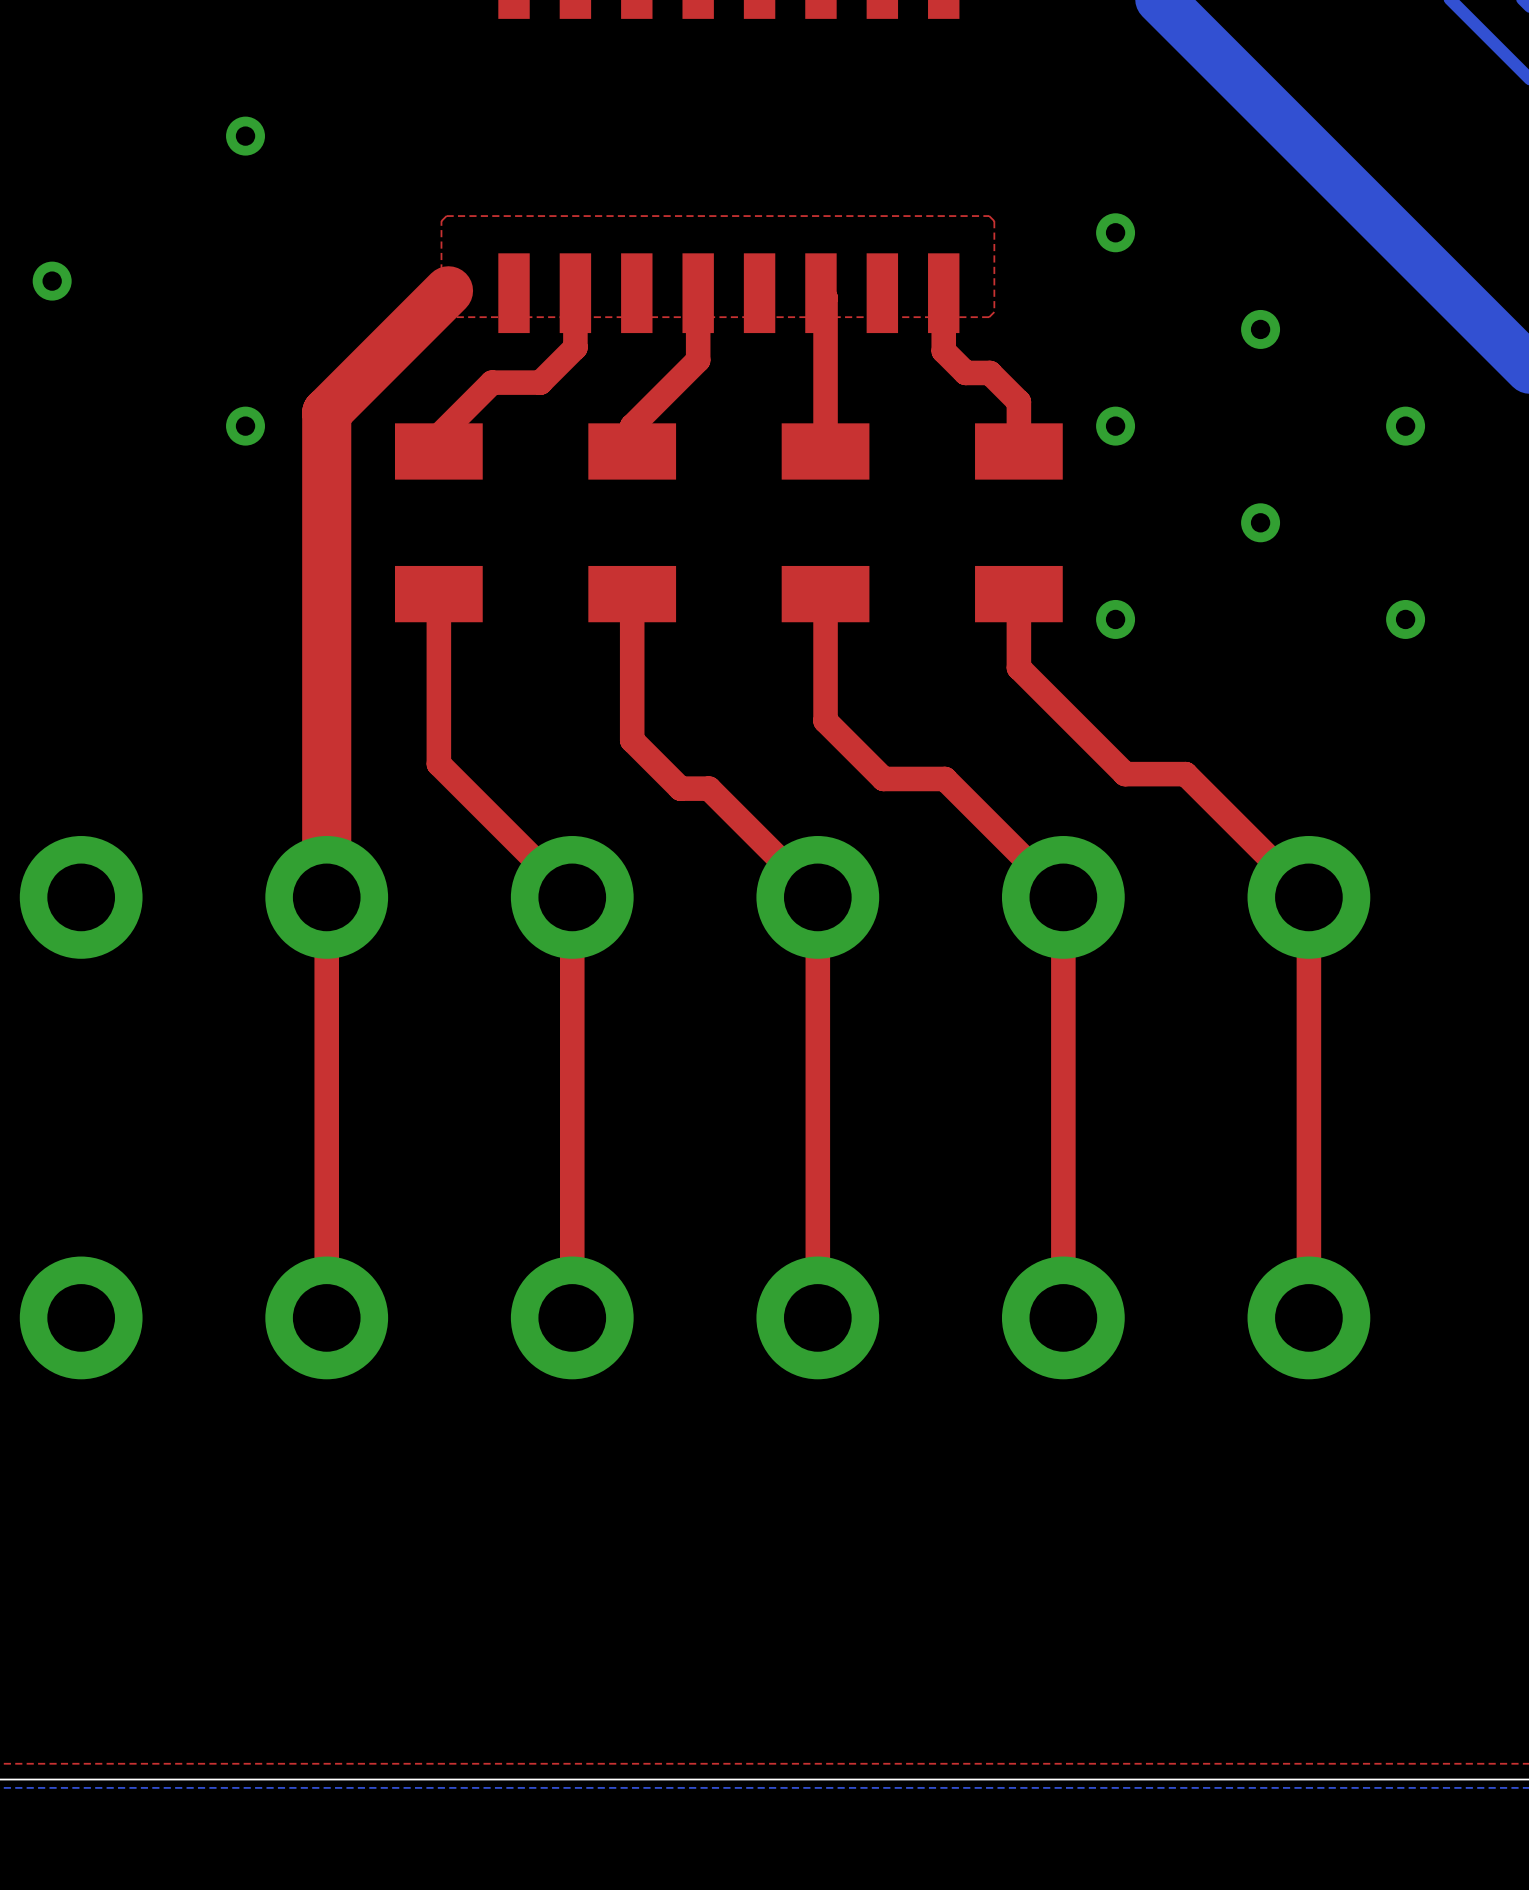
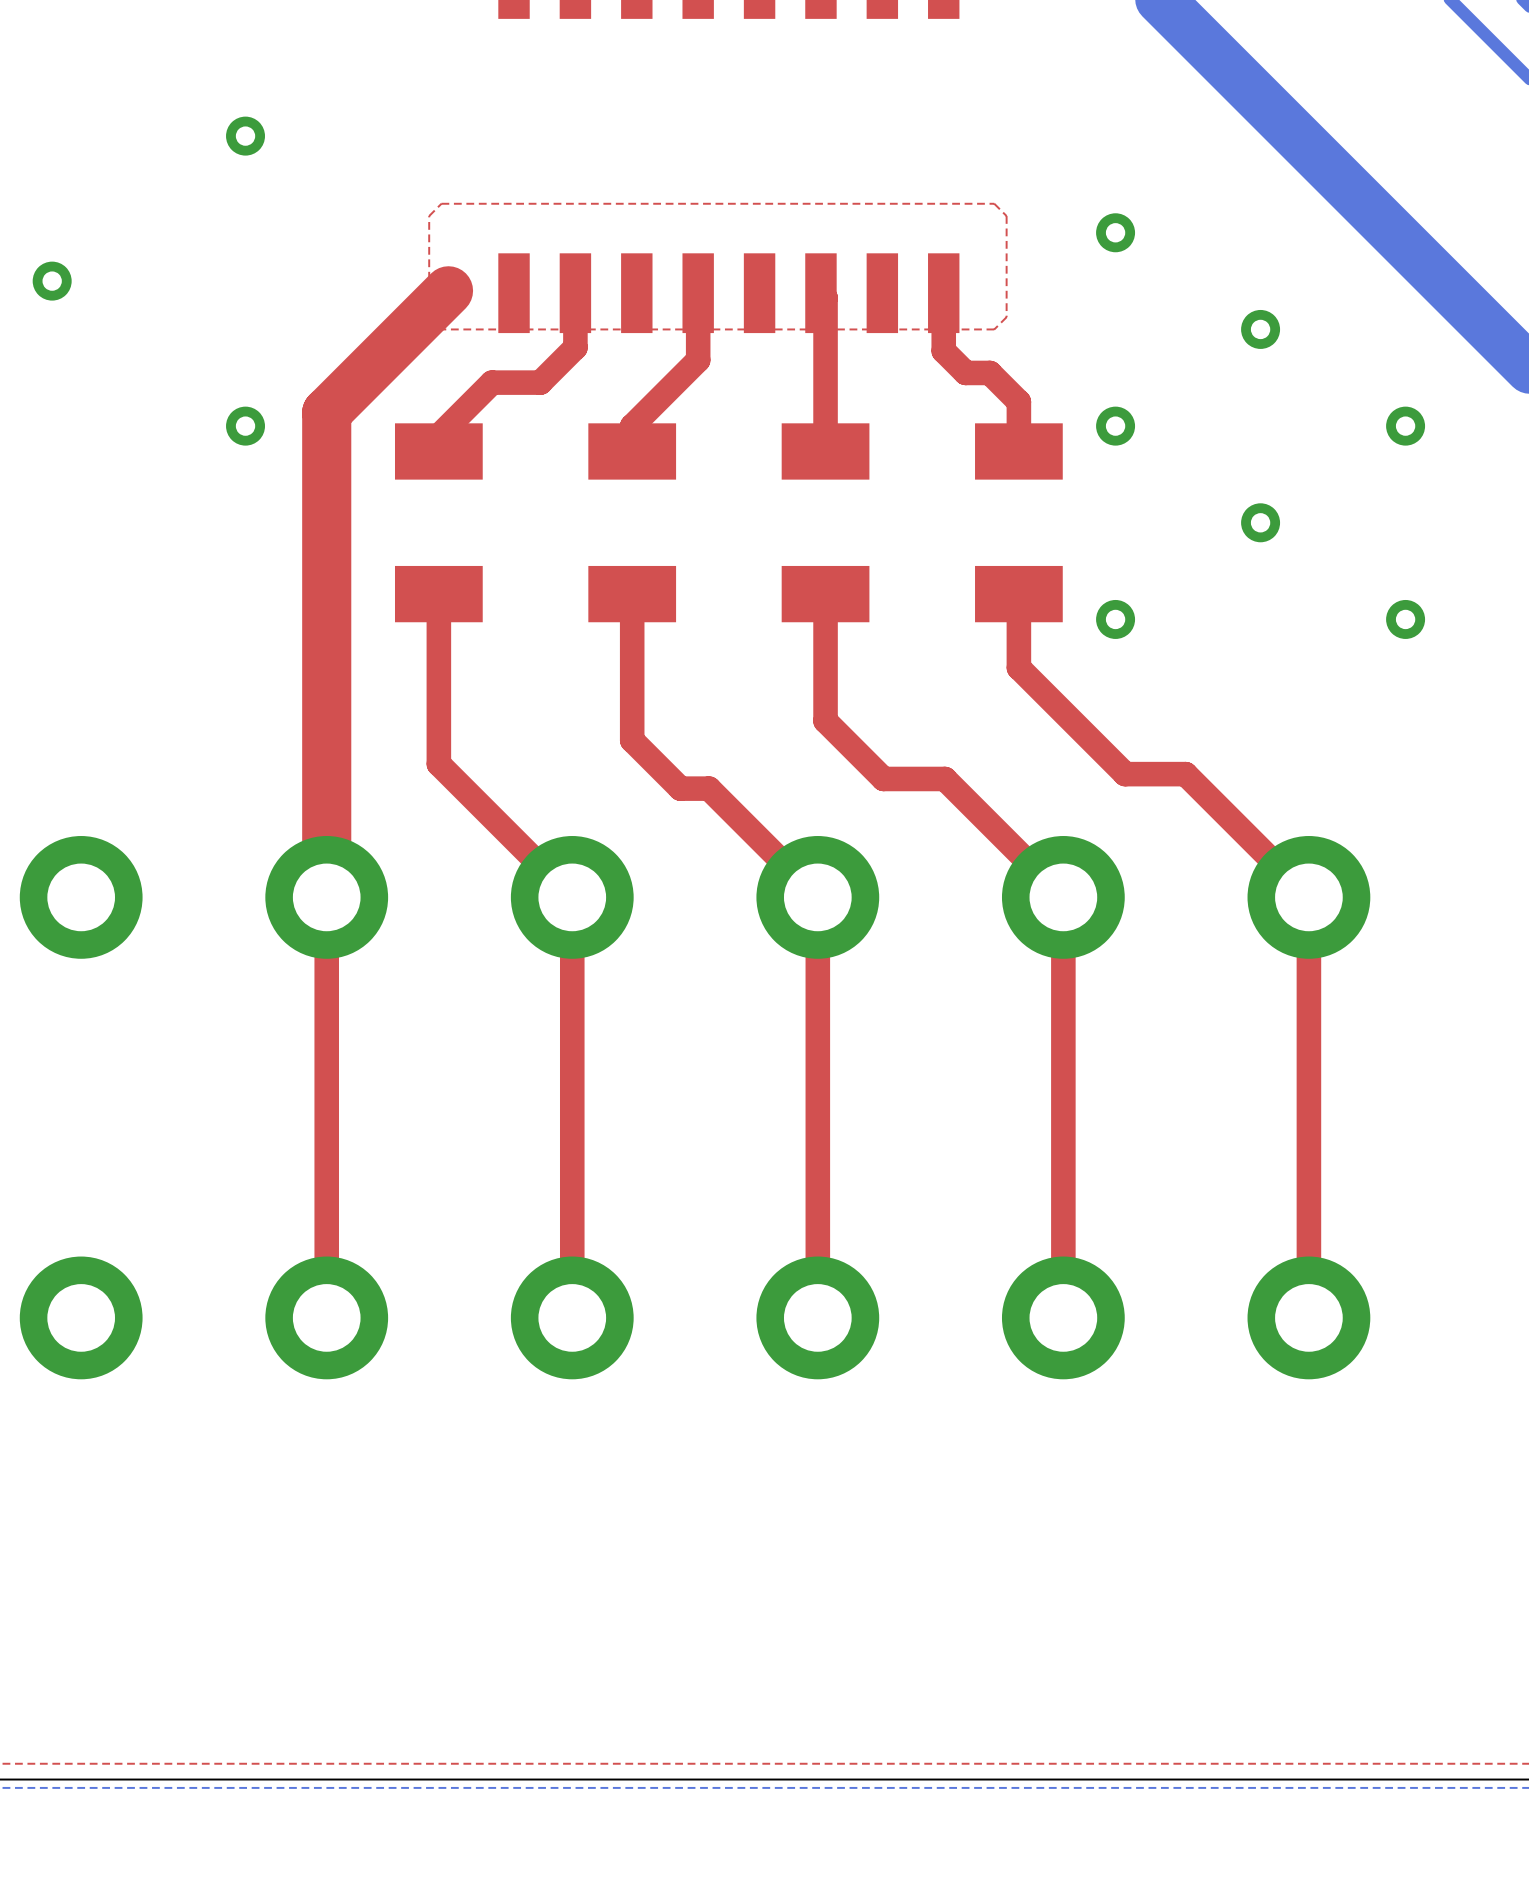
top zone outline: (989, 216) (446, 216) (441, 221) (441, 317) (989, 317) (994, 312) (994, 221) (989, 216) -> (994, 203) (1006, 216) (1006, 317) (994, 329) (429, 329) (429, 216) (441, 203) (994, 203)

